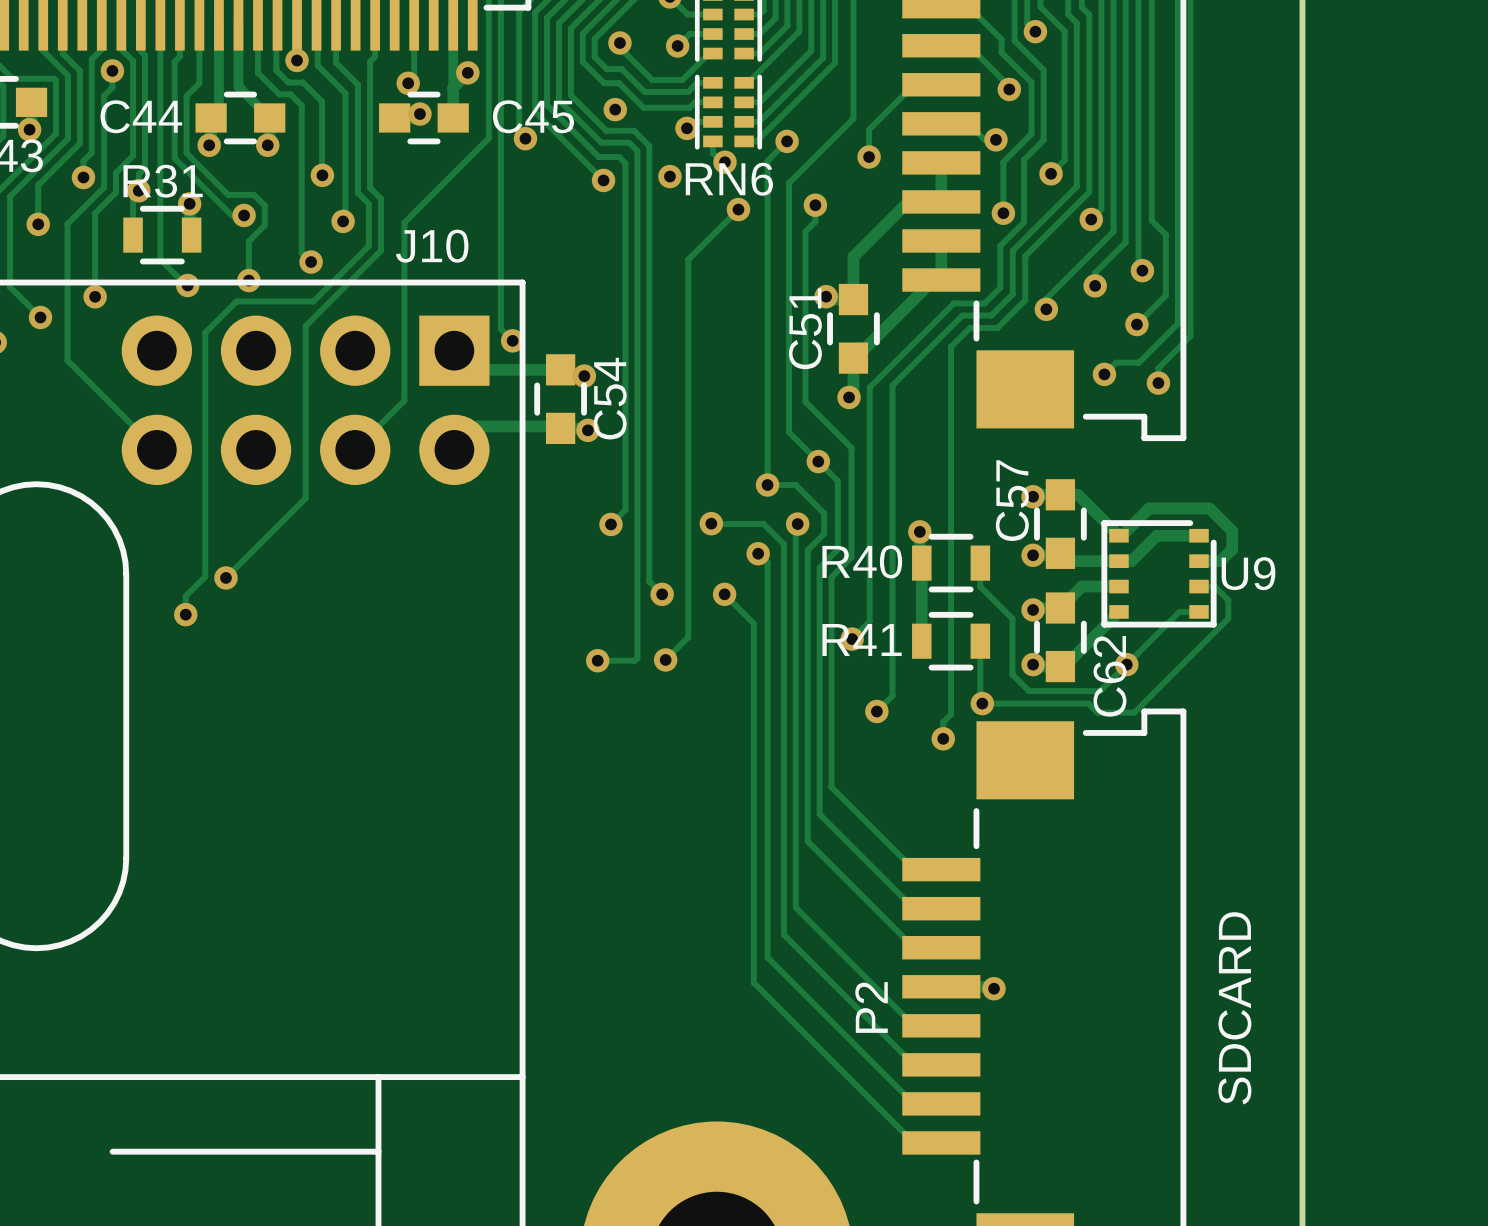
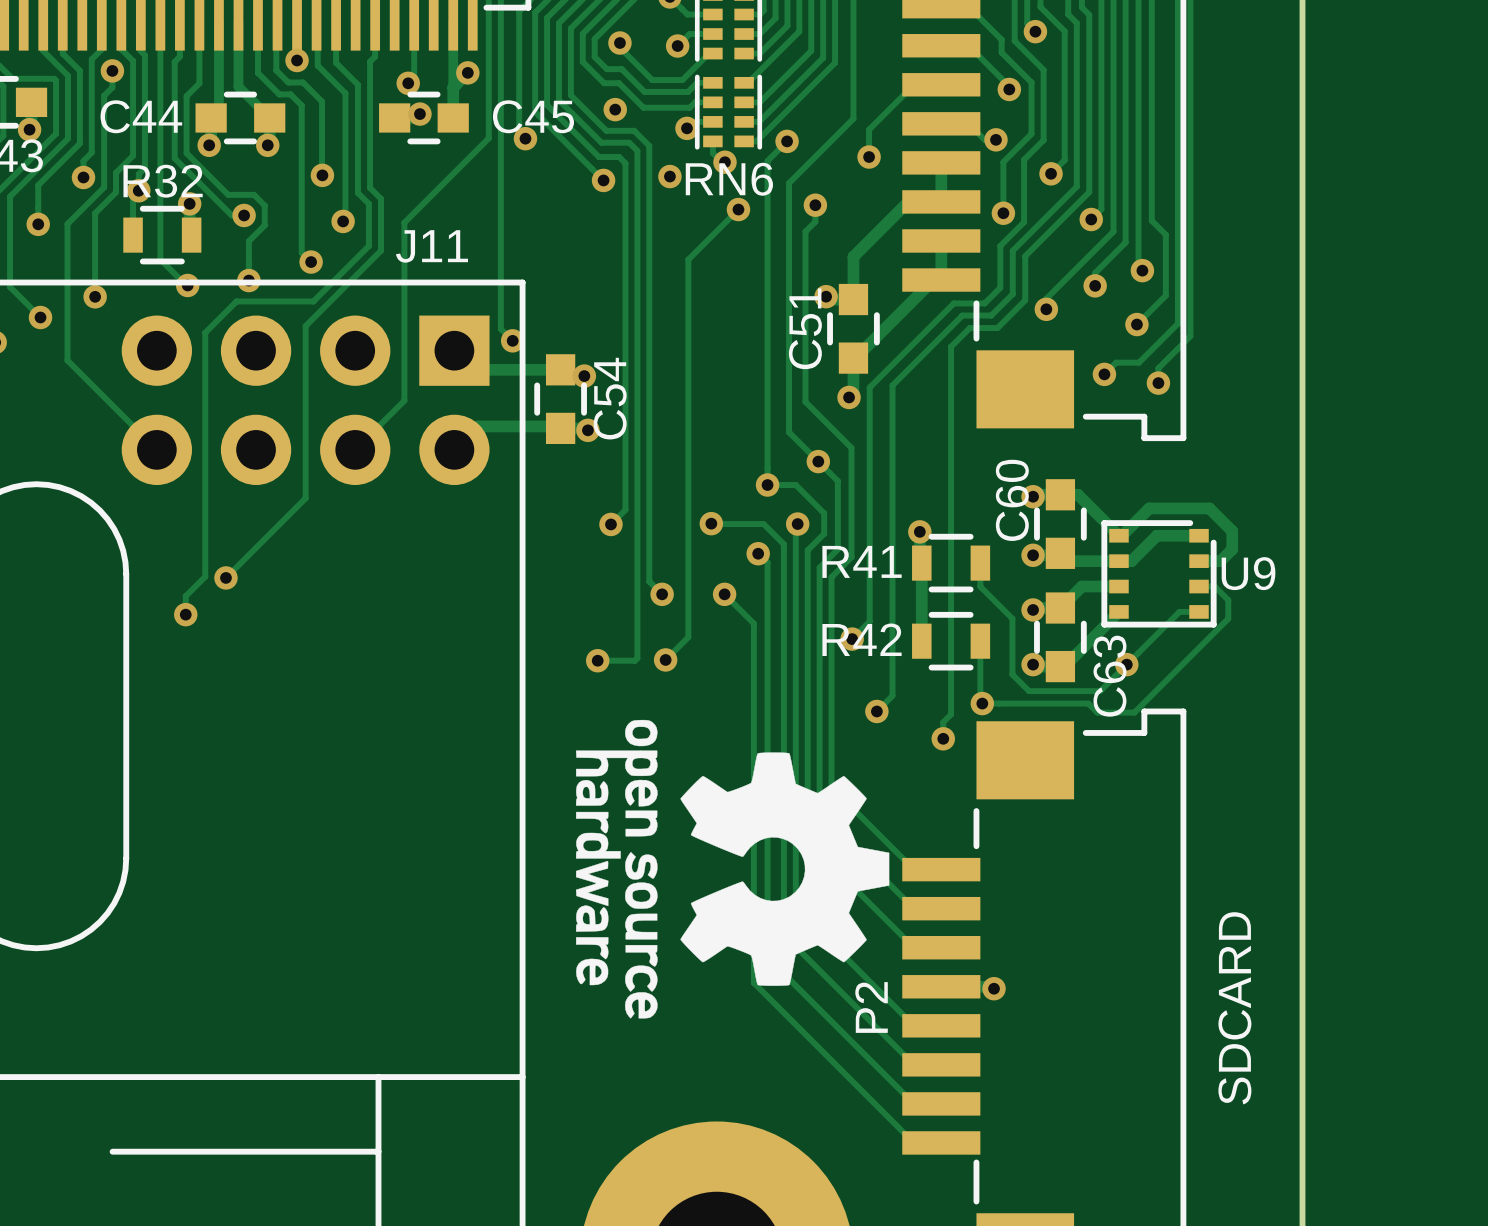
R31 name: R31 (163, 181) -> R32 (163, 181)
J10 name: J10 (432, 246) -> J11 (432, 246)
C57 name: C57 (1012, 500) -> C60 (1012, 500)
R40 name: R40 (862, 561) -> R41 (862, 561)
R41 name: R41 (862, 640) -> R42 (862, 639)
C62 name: C62 (1109, 676) -> C63 (1109, 676)
drawing: none -> [575, 719, 890, 1019]

